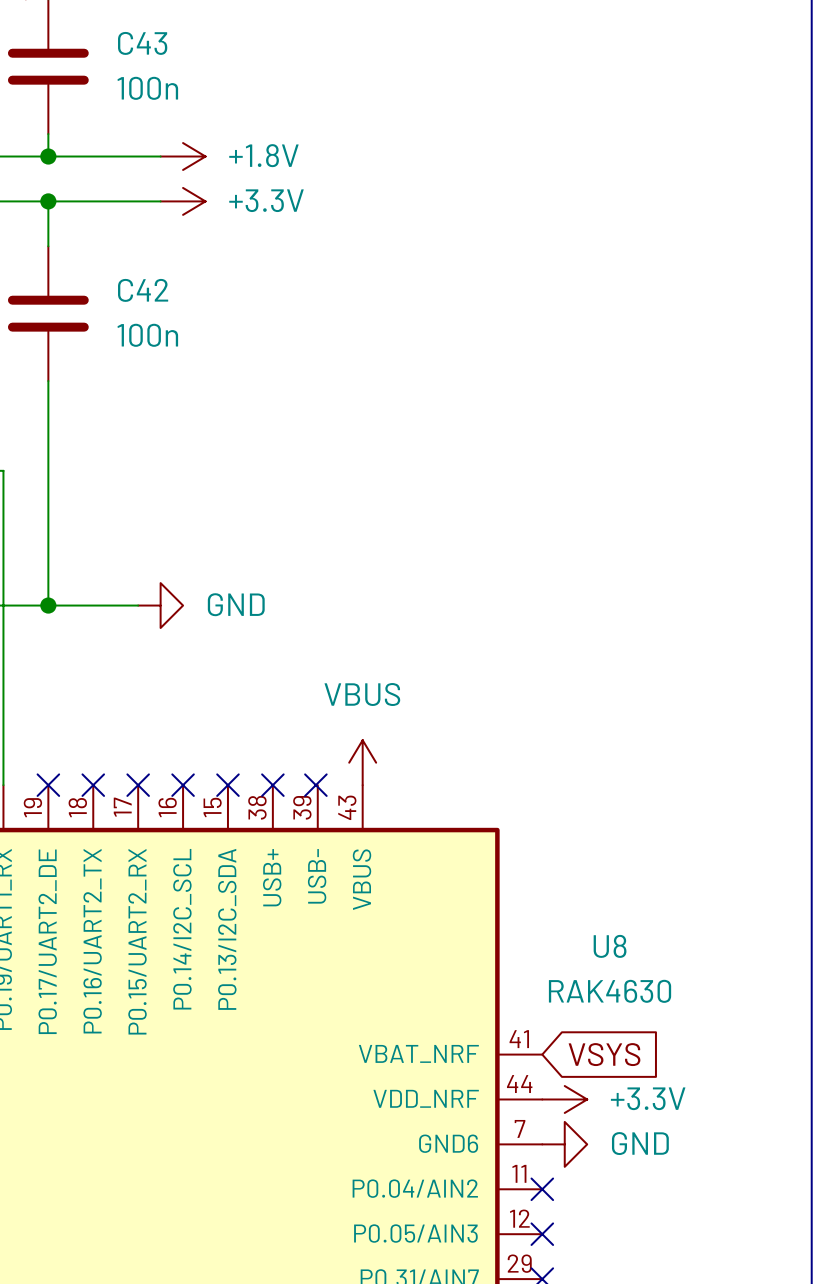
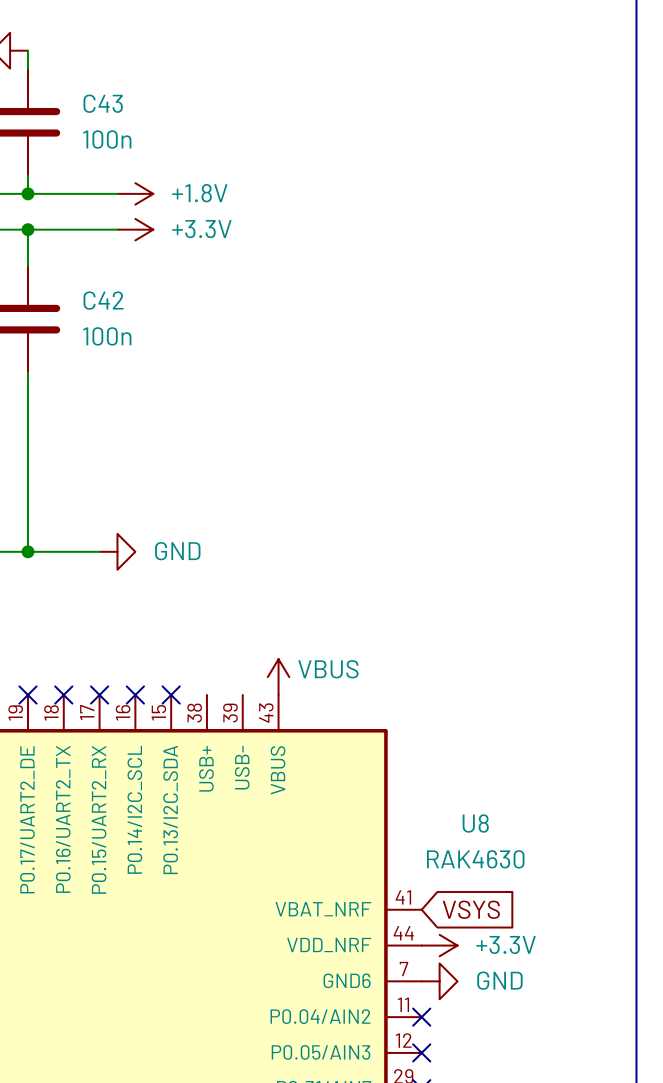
power symbol text position: VBUS (362, 694) -> VBUS (328, 669)
no-connect mark: (272, 785) -> none
no-connect mark: (315, 785) -> none

